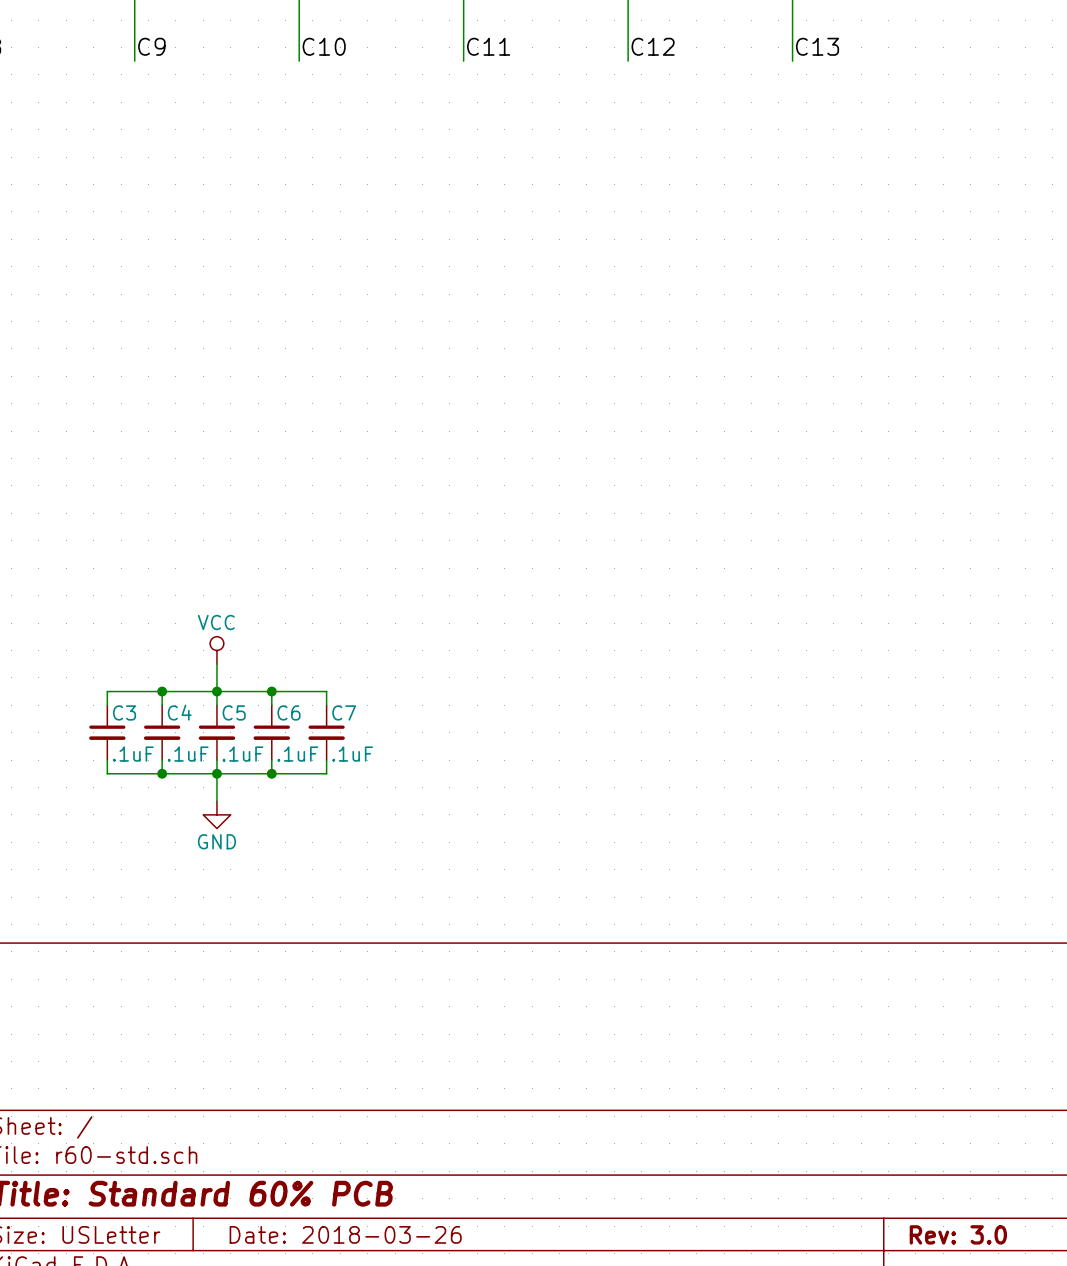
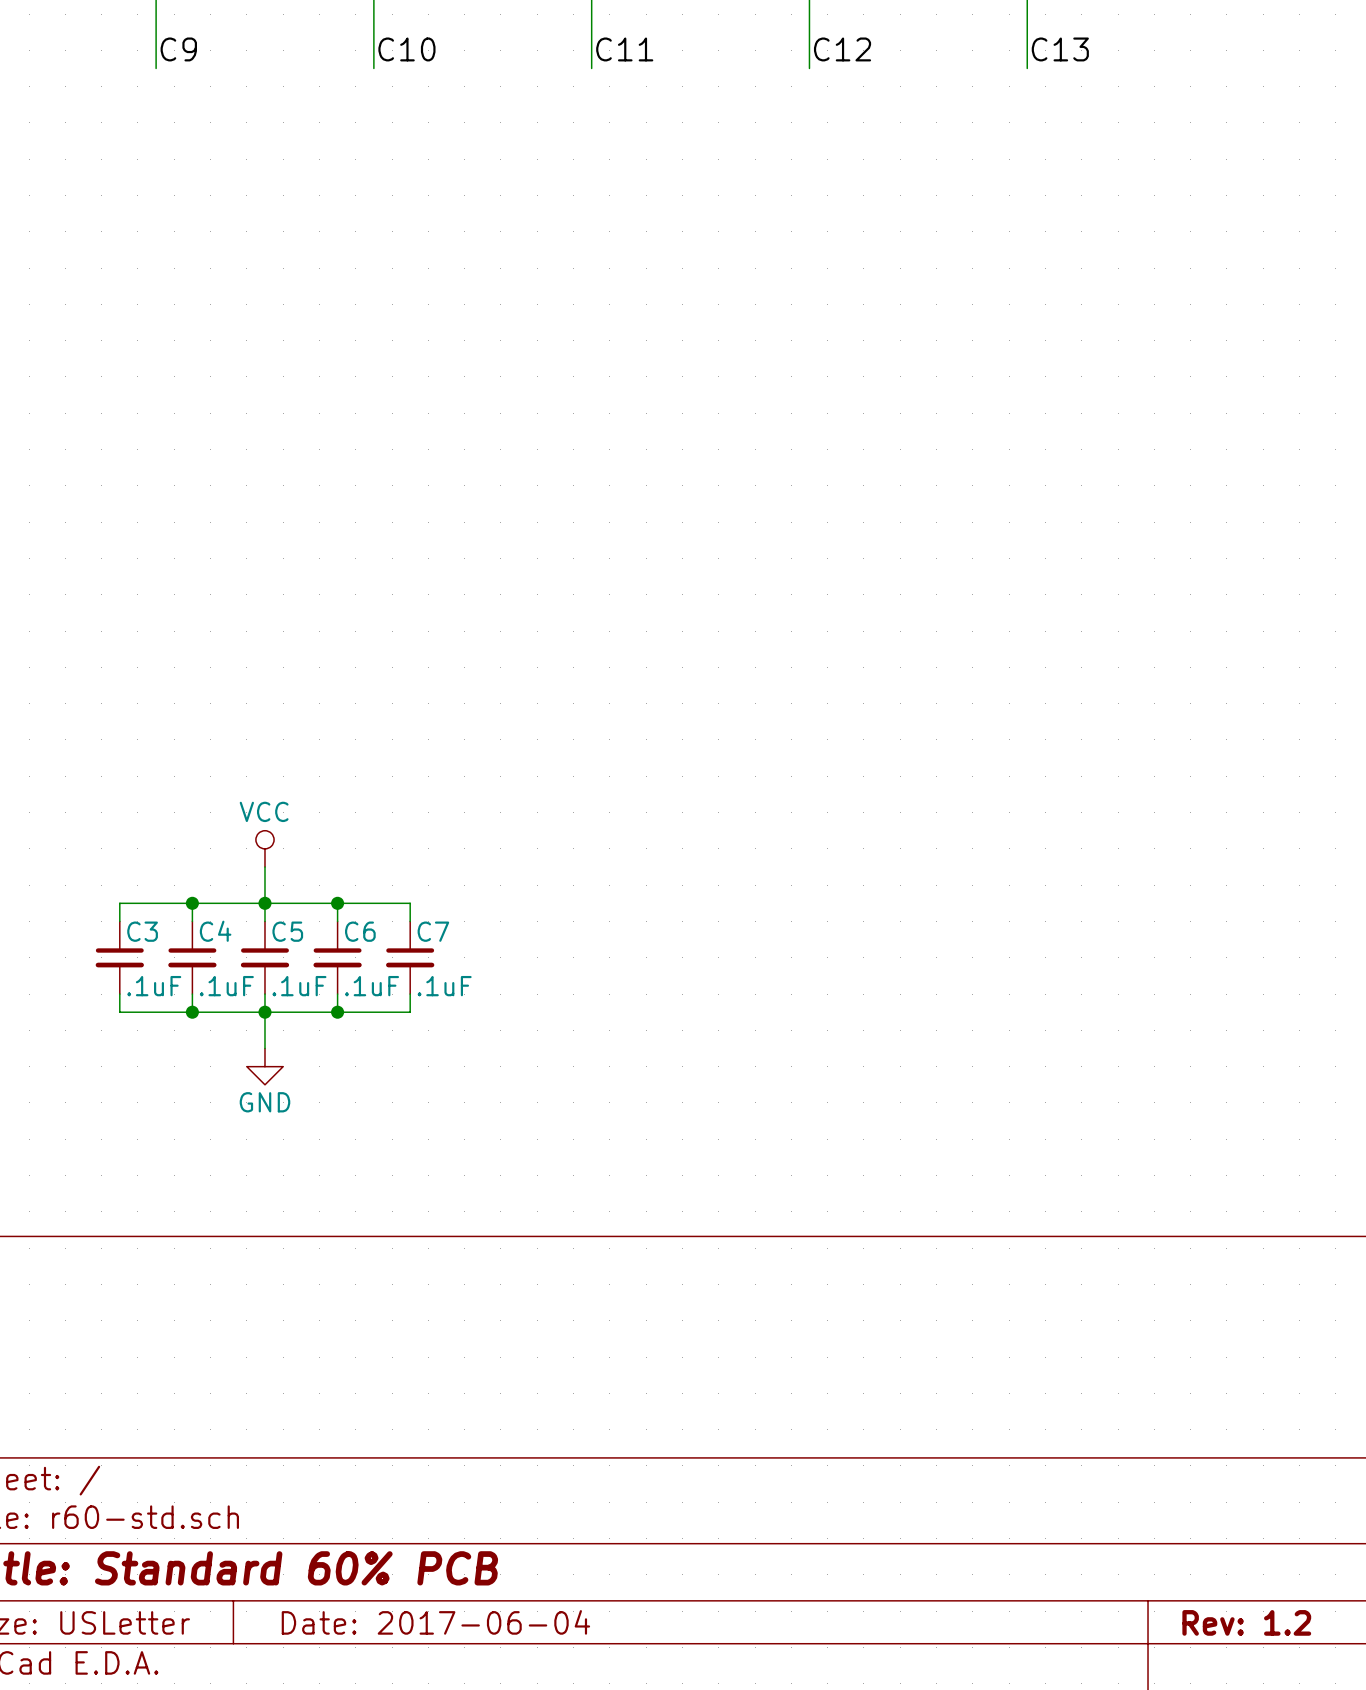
title block: Date: 2018-03-26 (345, 1234) -> Date: 2017-06-04 (435, 1622)
title block: Rev: 3.0 (958, 1234) -> Rev: 1.2 (1246, 1622)

